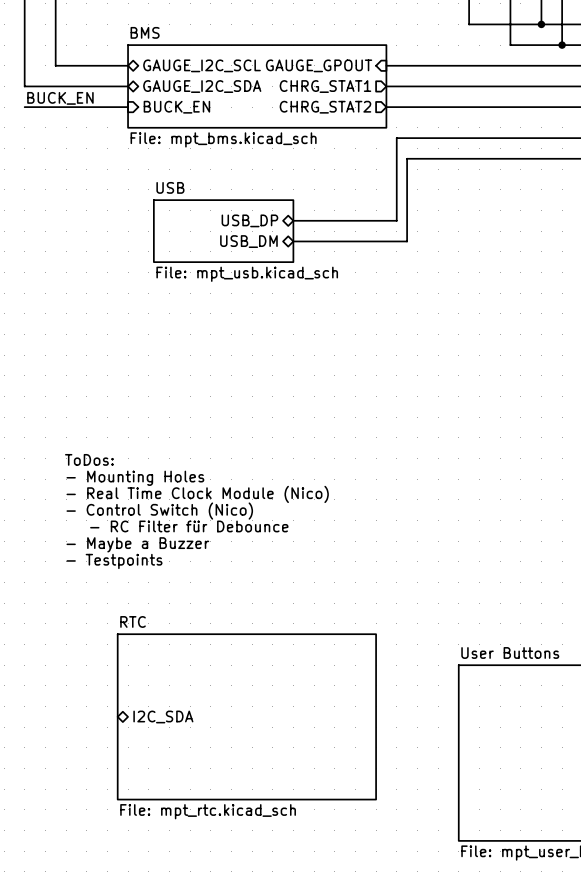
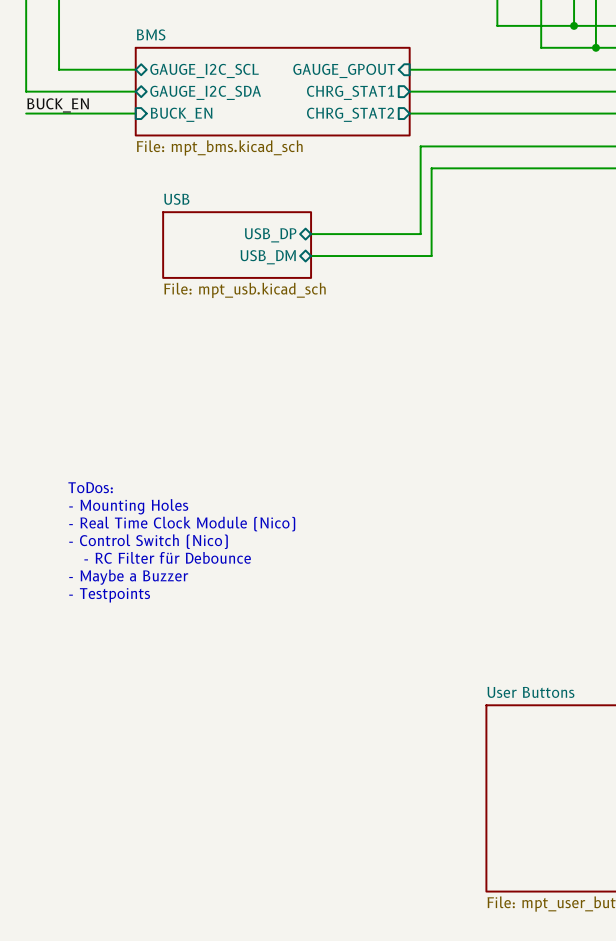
sheet pin: I2C_SDA (163, 716) -> none
sheet RTC: File: mpt_rtc.kicad_sch (246, 716) -> none

